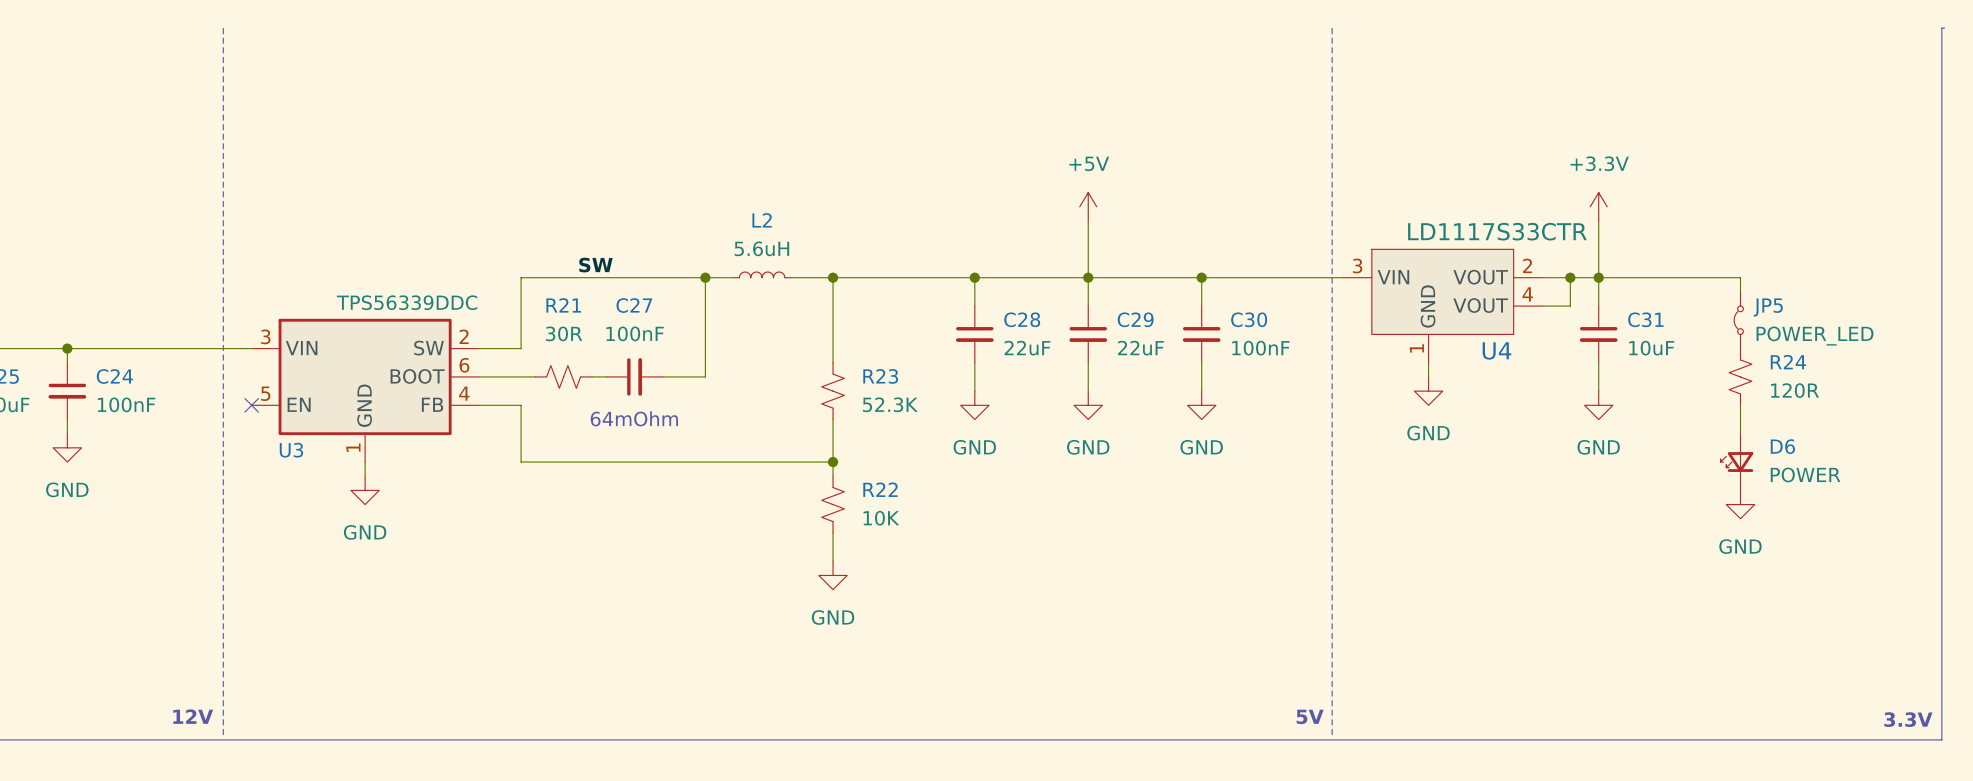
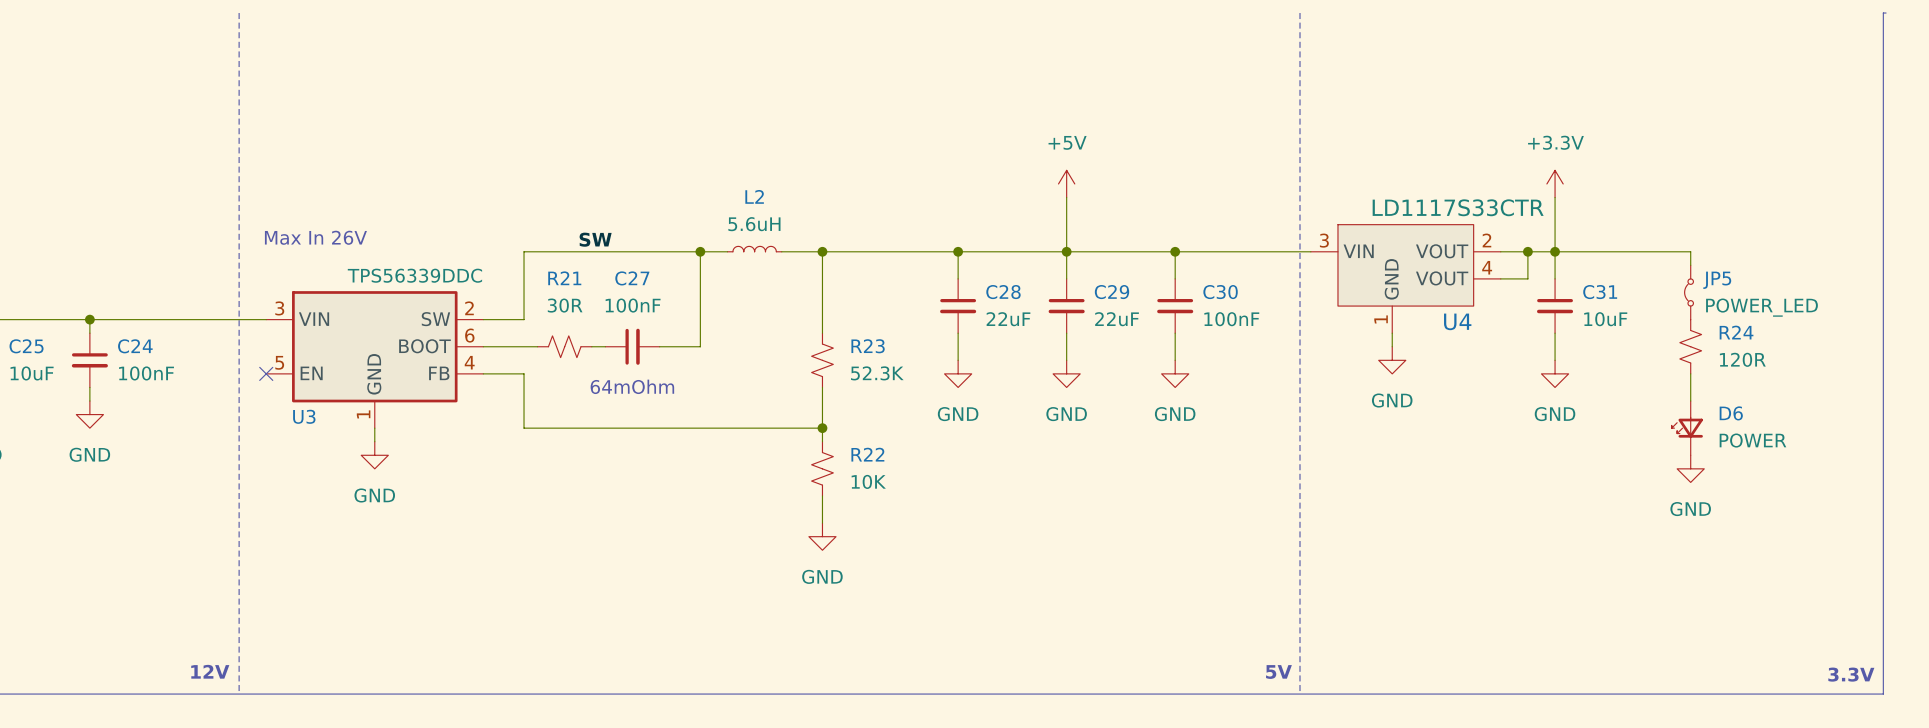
text: none -> Max In 26V (315, 237)

